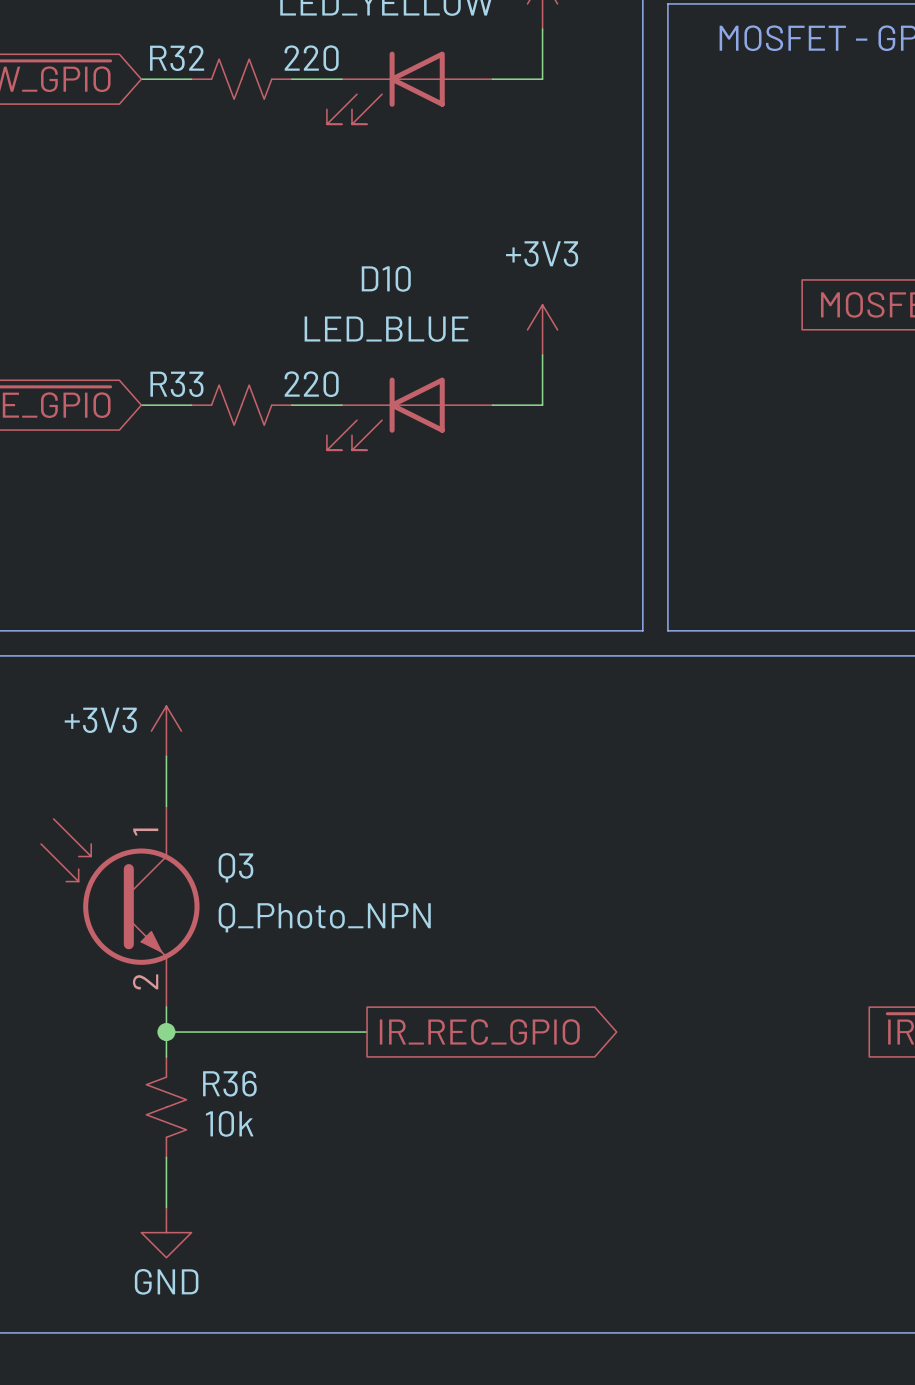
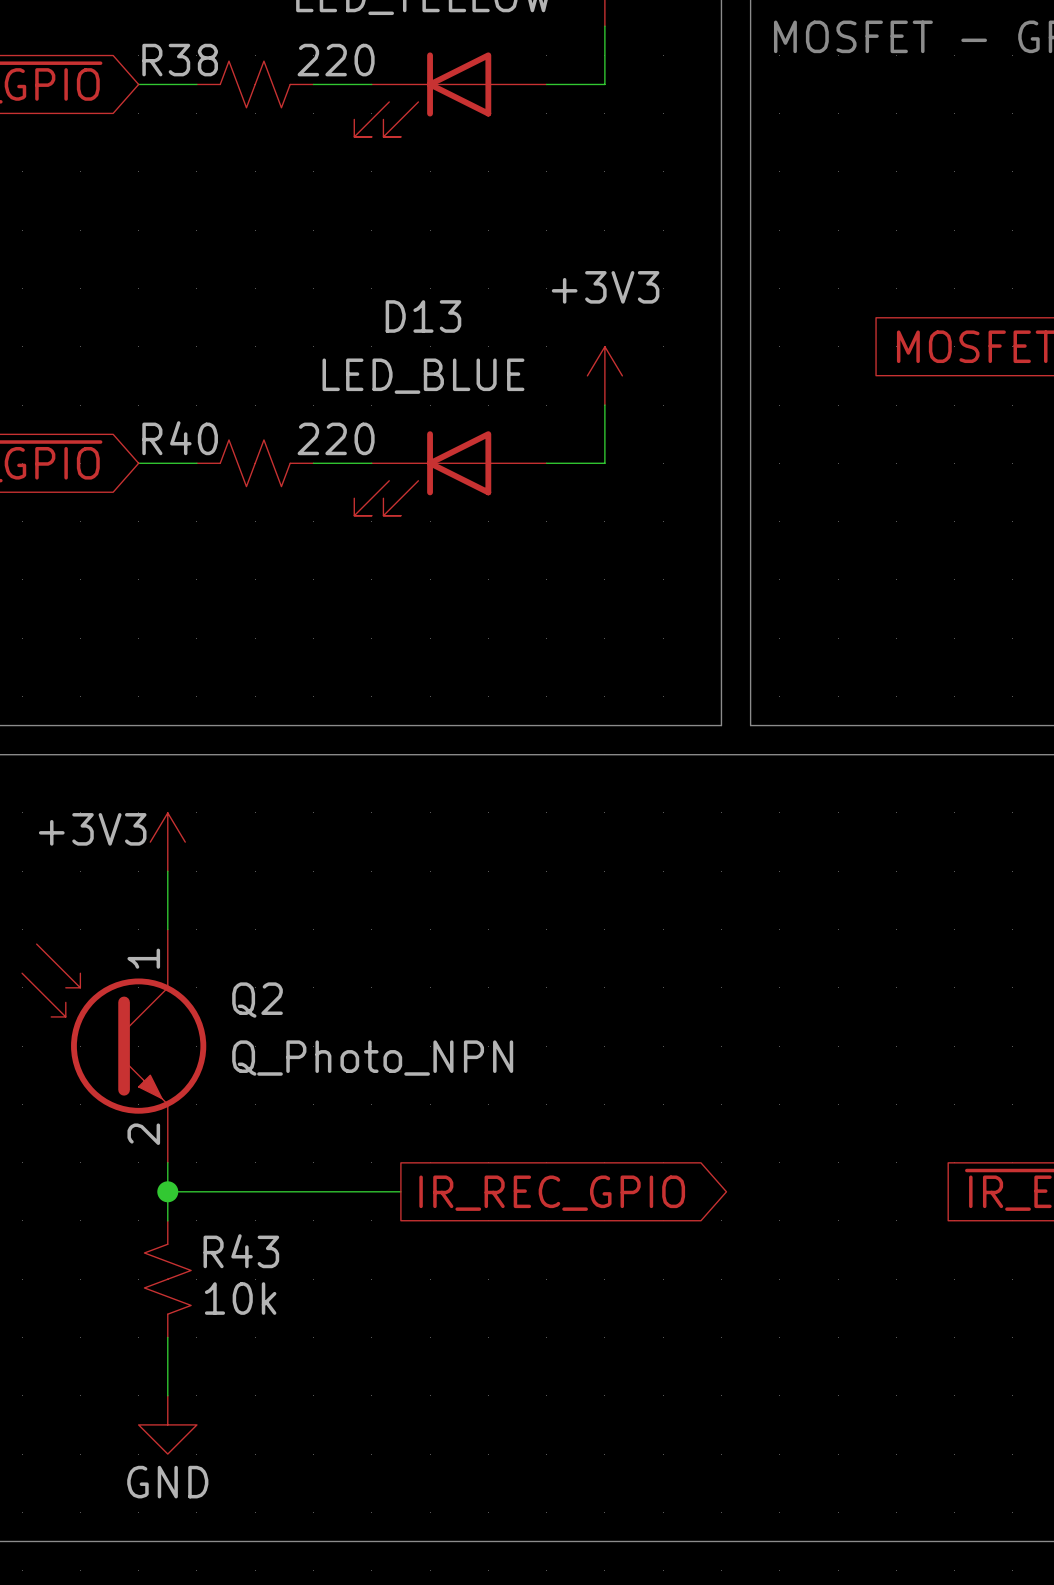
R32 name: R32 (177, 58) -> R38 (180, 60)
D10 name: D10 (386, 278) -> D13 (423, 316)
R33 name: R33 (176, 384) -> R40 (180, 438)
Q3 name: Q3 (236, 867) -> Q2 (257, 1000)
R36 name: R36 (229, 1083) -> R43 (241, 1251)

